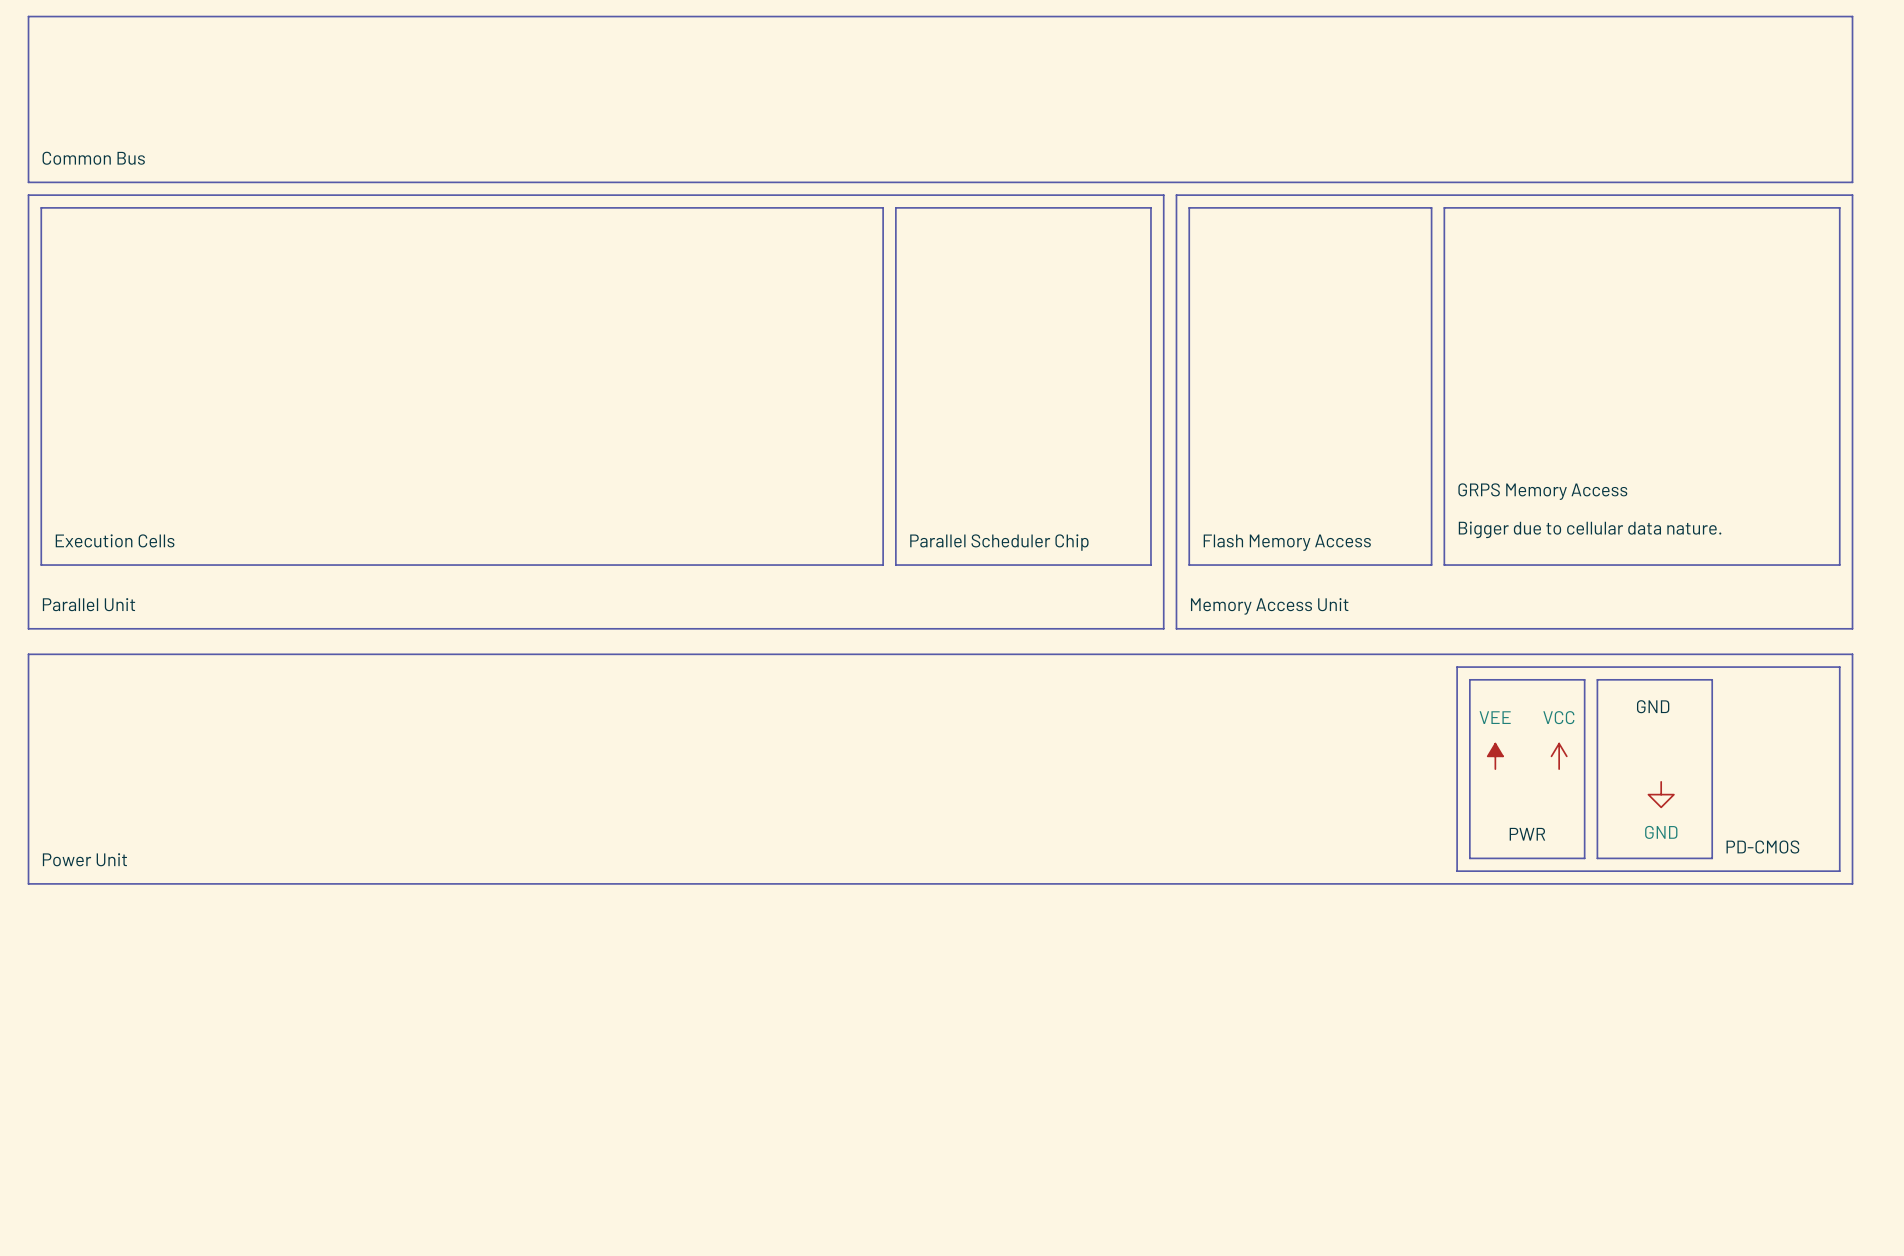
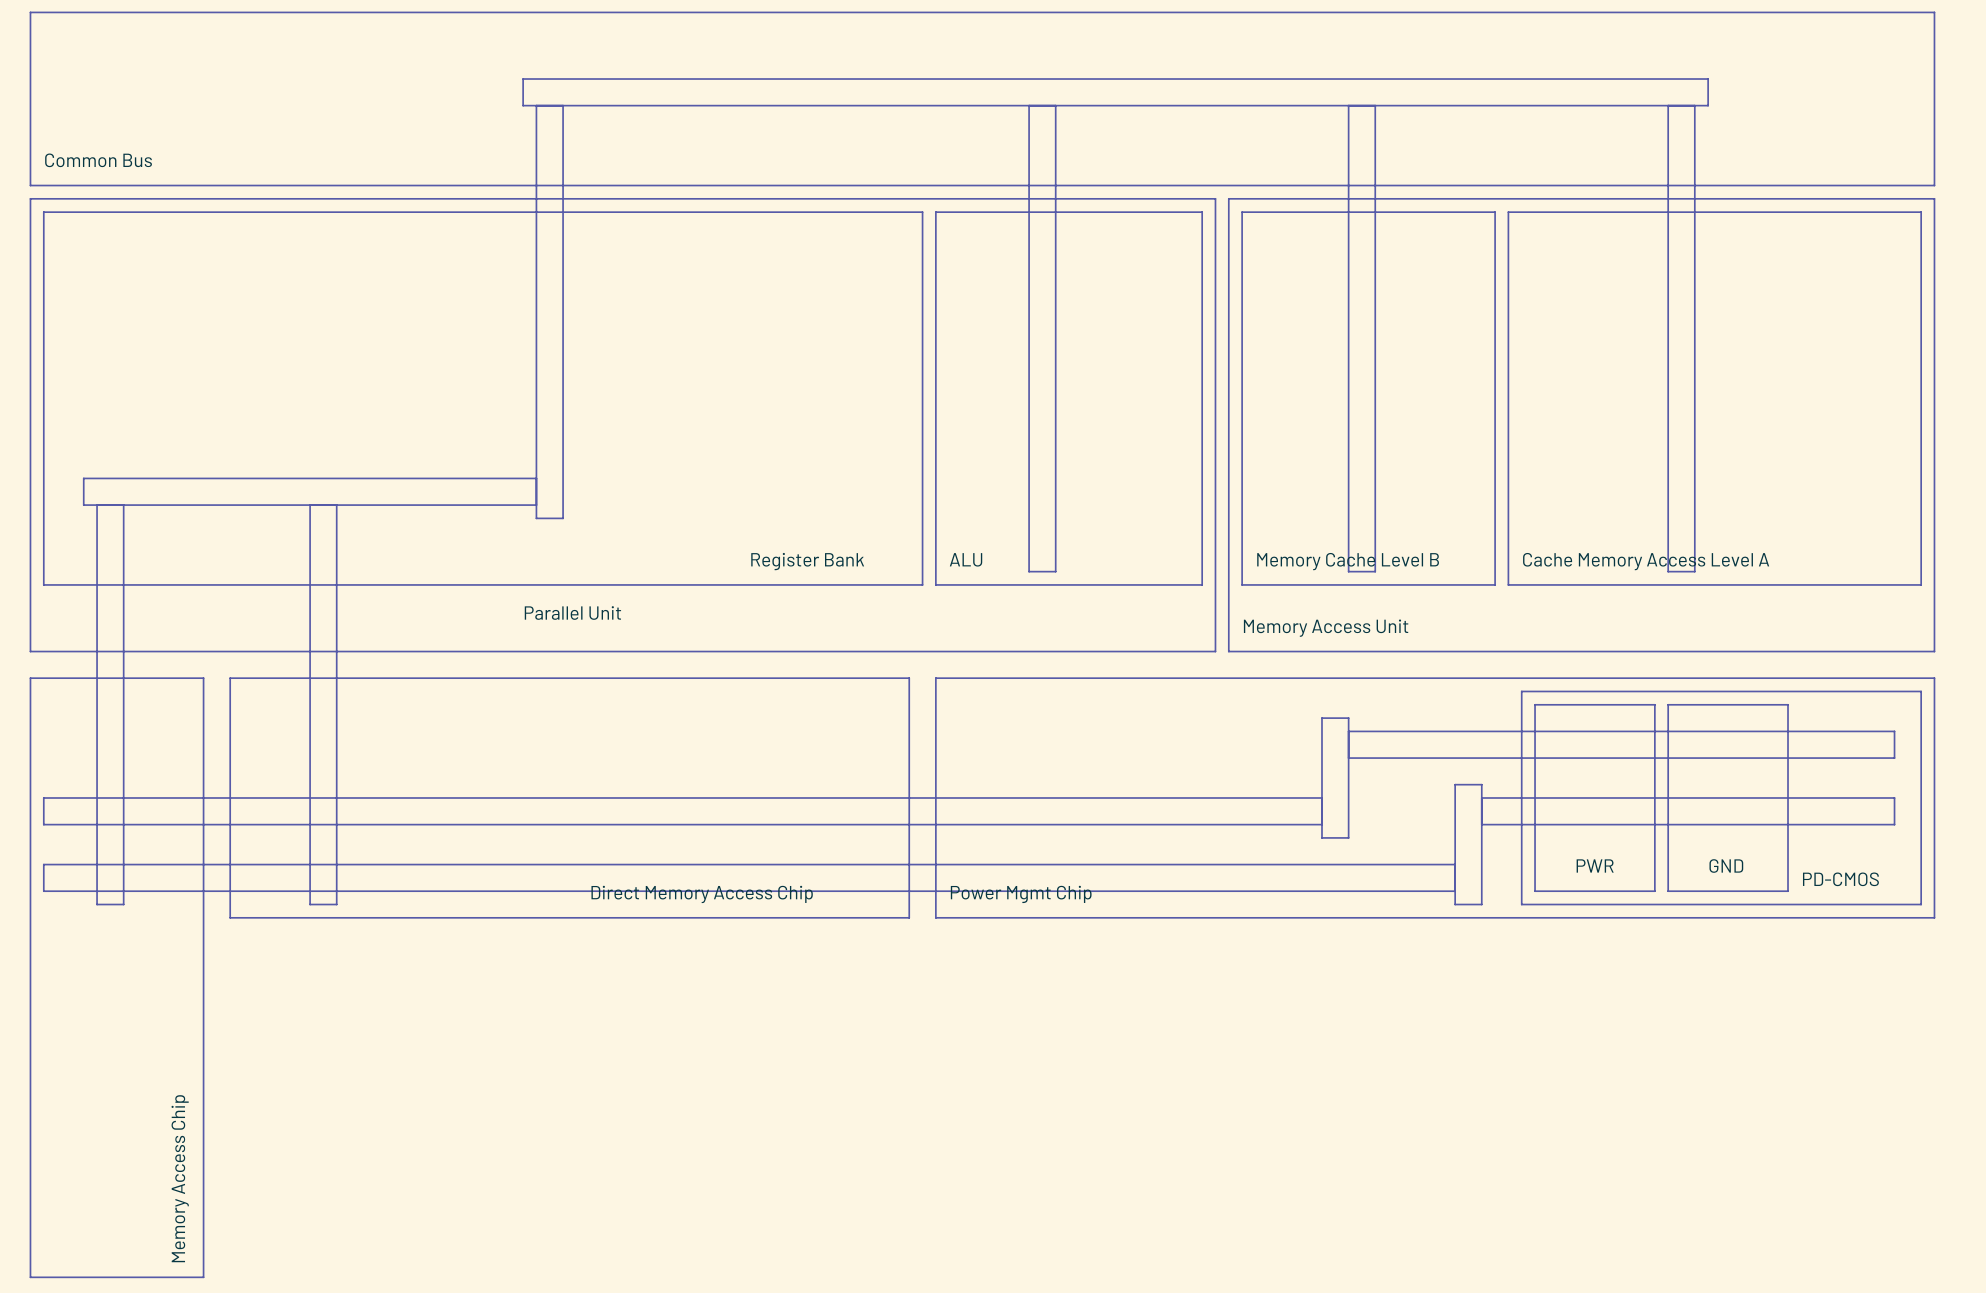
line: none -> (523, 79) (1708, 79) (1708, 105) (523, 105) (523, 79)
line: none -> (536, 105) (536, 518) (563, 518) (563, 105)
line: none -> (1029, 105) (1029, 571) (1055, 571) (1055, 105)
line: none -> (1348, 105) (1348, 571) (1375, 571) (1375, 105)
line: none -> (1668, 105) (1668, 571) (1694, 571) (1694, 105)
line: none -> (536, 478) (83, 478) (83, 505) (536, 505)
line: none -> (97, 505) (97, 904) (123, 904) (123, 505)
line: none -> (310, 505) (310, 904) (336, 904) (336, 505)
label: GRPS Memory Access (1542, 491) -> none
label: Bigger due to cellular data nature. (1590, 529) -> none
label: Execution Cells (115, 540) -> none
label: none -> Register Bank (807, 561)
label: Parallel Scheduler Chip (999, 542) -> ALU (966, 559)
label: Flash Memory Access (1287, 542) -> Memory Cache Level B (1348, 561)
label: none -> Cache Memory Access Level A (1646, 561)
label: none -> Parallel Unit (572, 613)
label: Parallel Unit (88, 604) -> none
line: (194, 654) (219, 654) -> (230, 917) (230, 678)
line: (870, 654) (895, 654) -> (909, 678) (909, 917)
line: none -> (1321, 718) (1321, 837) (1348, 837) (1348, 718) (1321, 718)
line: none -> (1348, 731) (1894, 731) (1894, 758) (1348, 758)
label position: GND (1653, 706) -> GND (1726, 866)
line: none -> (1455, 784) (1455, 904) (1481, 904) (1481, 784) (1455, 784)
power symbol: VEE (1495, 756) -> none
power symbol: VCC (1559, 756) -> none
line: none -> (1321, 797) (43, 797) (43, 824) (1321, 824)
line: none -> (1481, 797) (1894, 797) (1894, 824) (1481, 824)
power symbol: GND (1661, 794) -> none
line: none -> (1455, 864) (43, 864) (43, 891) (1455, 891)
label: Power Unit (84, 859) -> none
label: none -> Direct Memory Access Chip (702, 894)
label: none -> Power Mgmt Chip (1021, 894)
line: (28, 883) (219, 883) -> (30, 917) (30, 1277) (203, 1277) (203, 678)
line: (870, 883) (895, 883) -> (935, 678) (935, 917)
label: none -> Memory Access Chip (180, 1178)

